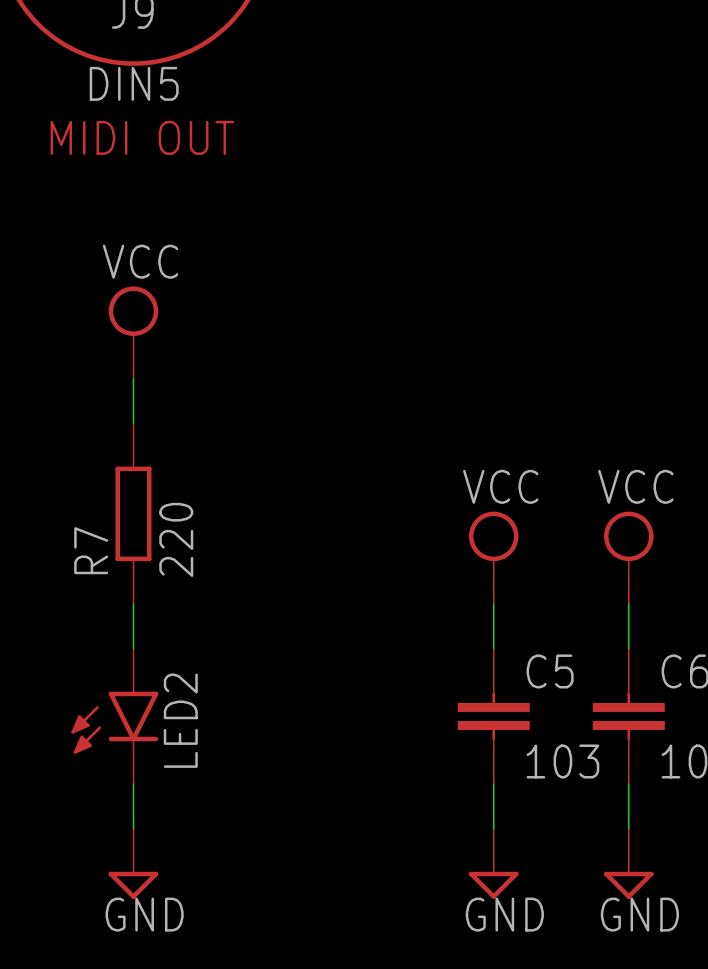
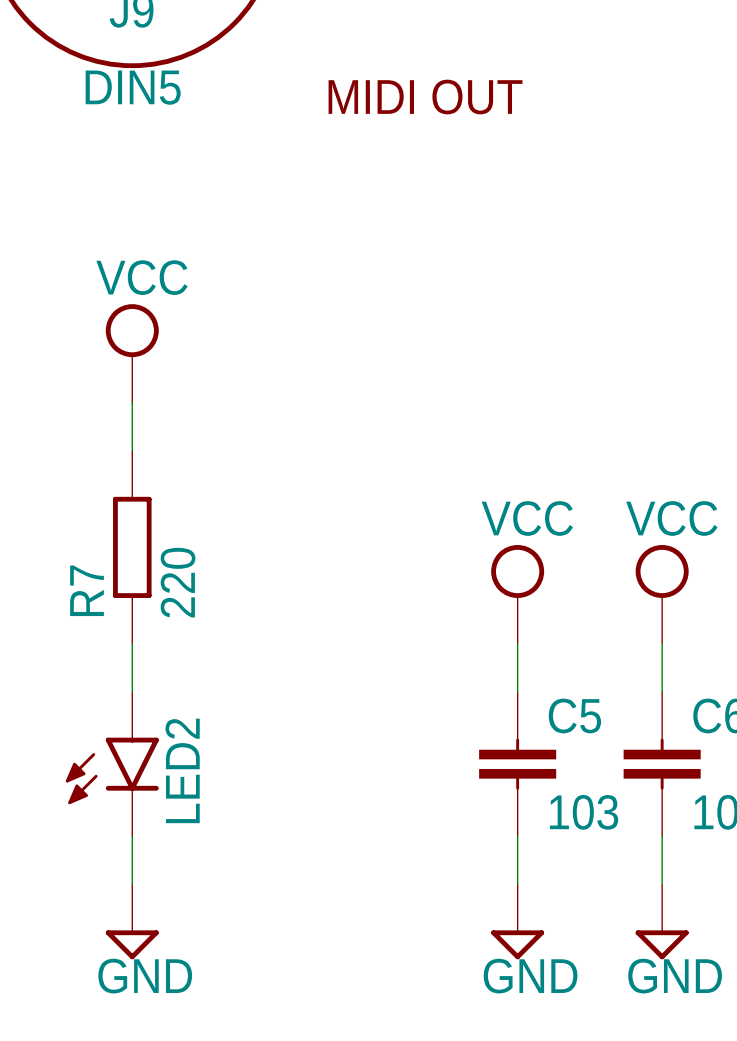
text position: MIDI OUT (142, 137) -> MIDI OUT (425, 97)

